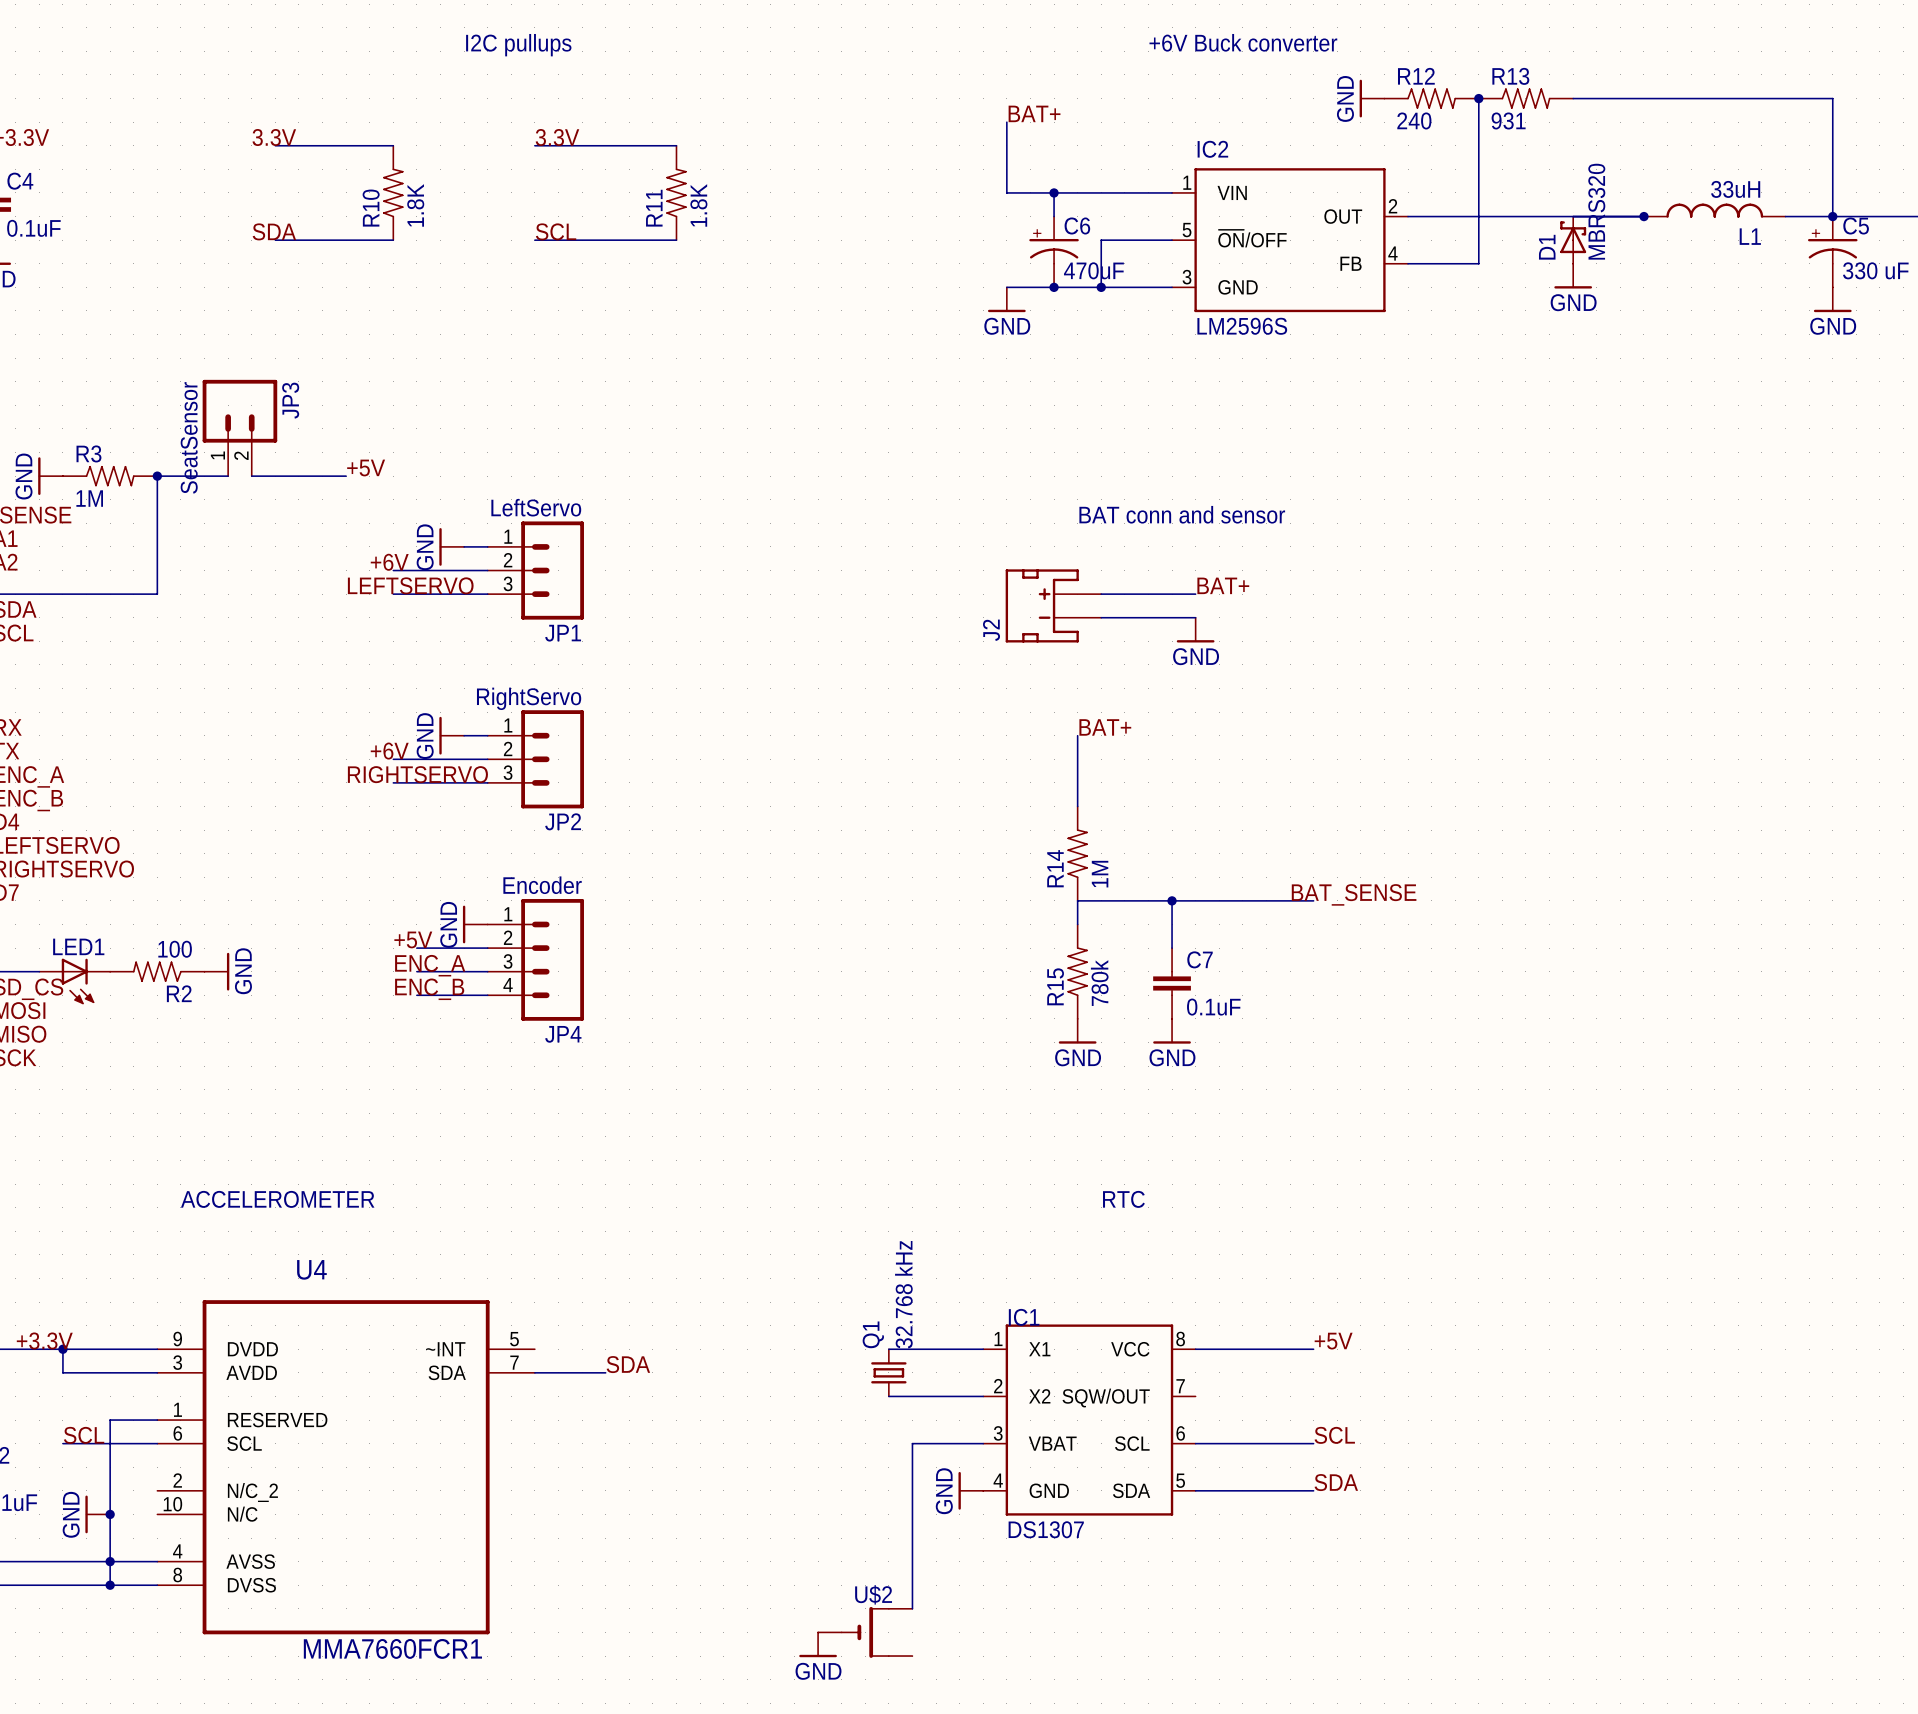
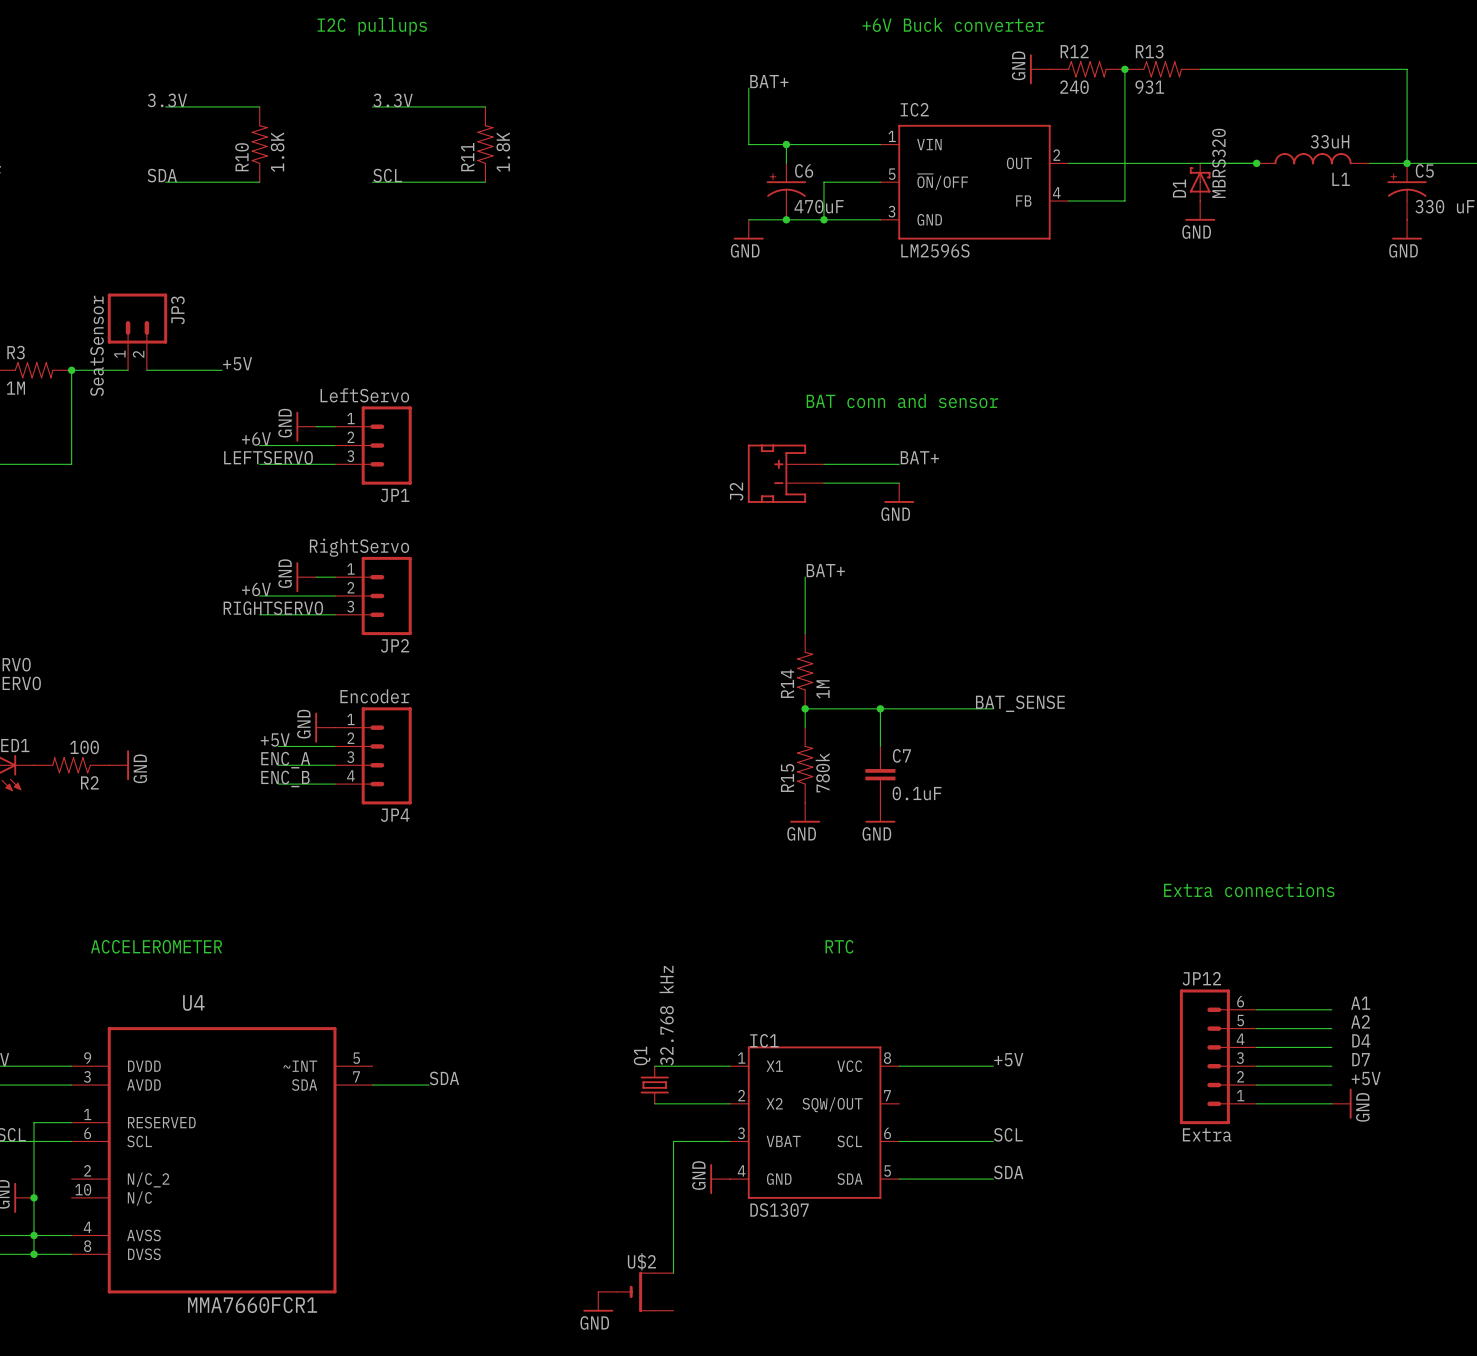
junction: none -> (805, 708)
text: none -> Extra connections (1249, 890)
label: none -> A1 (1360, 1003)
wire: none -> (1256, 1009) (1331, 1009)
label: none -> A2 (1360, 1021)
wire: none -> (1256, 1028) (1331, 1028)
label: none -> D4 (1361, 1040)
wire: none -> (1256, 1047) (1331, 1047)
JP12: none -> Extra (1218, 1056)
label: none -> D7 (1361, 1059)
wire: none -> (1256, 1066) (1331, 1066)
label: none -> +5V (1366, 1078)
wire: none -> (1256, 1085) (1331, 1085)
wire: none -> (1256, 1103) (1331, 1103)
power symbol: none -> GND (1341, 1103)

